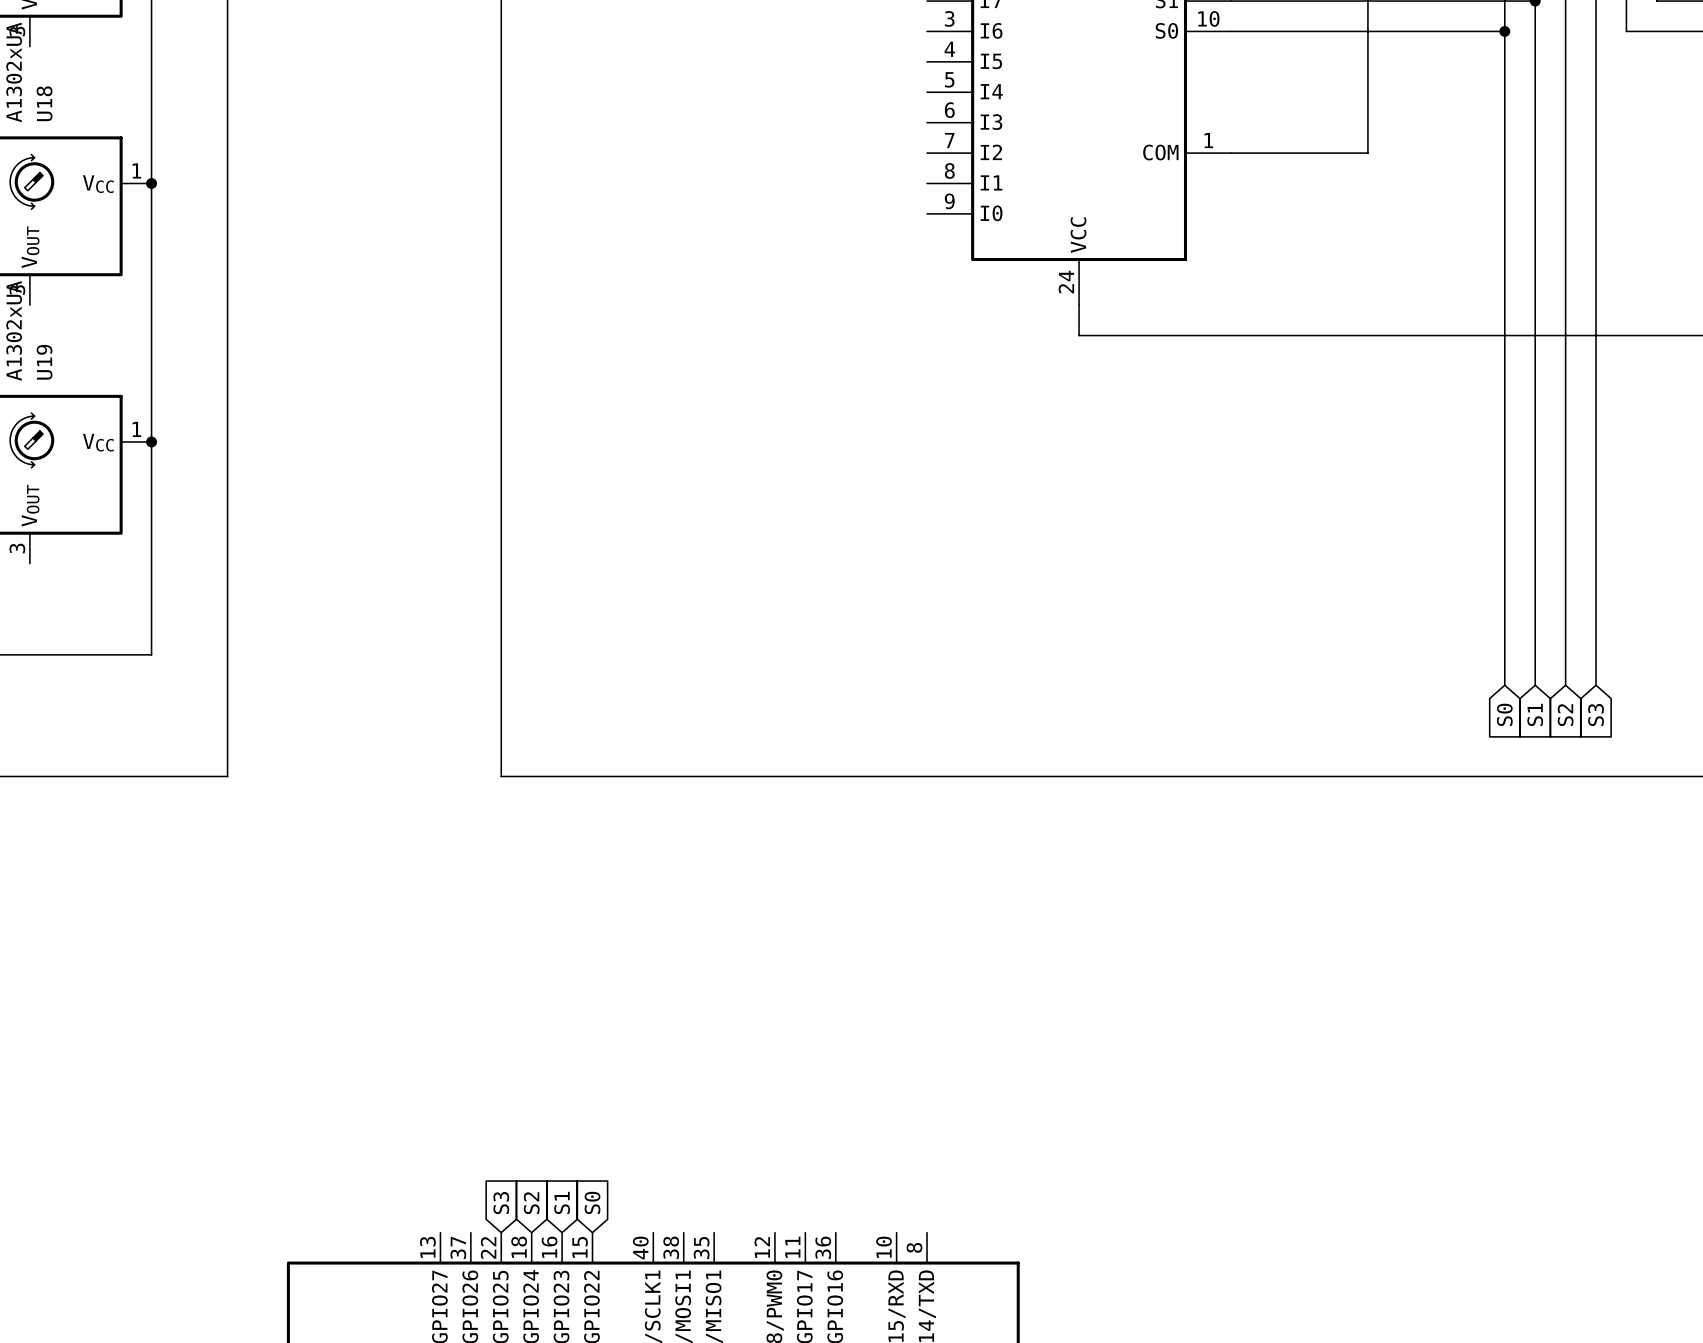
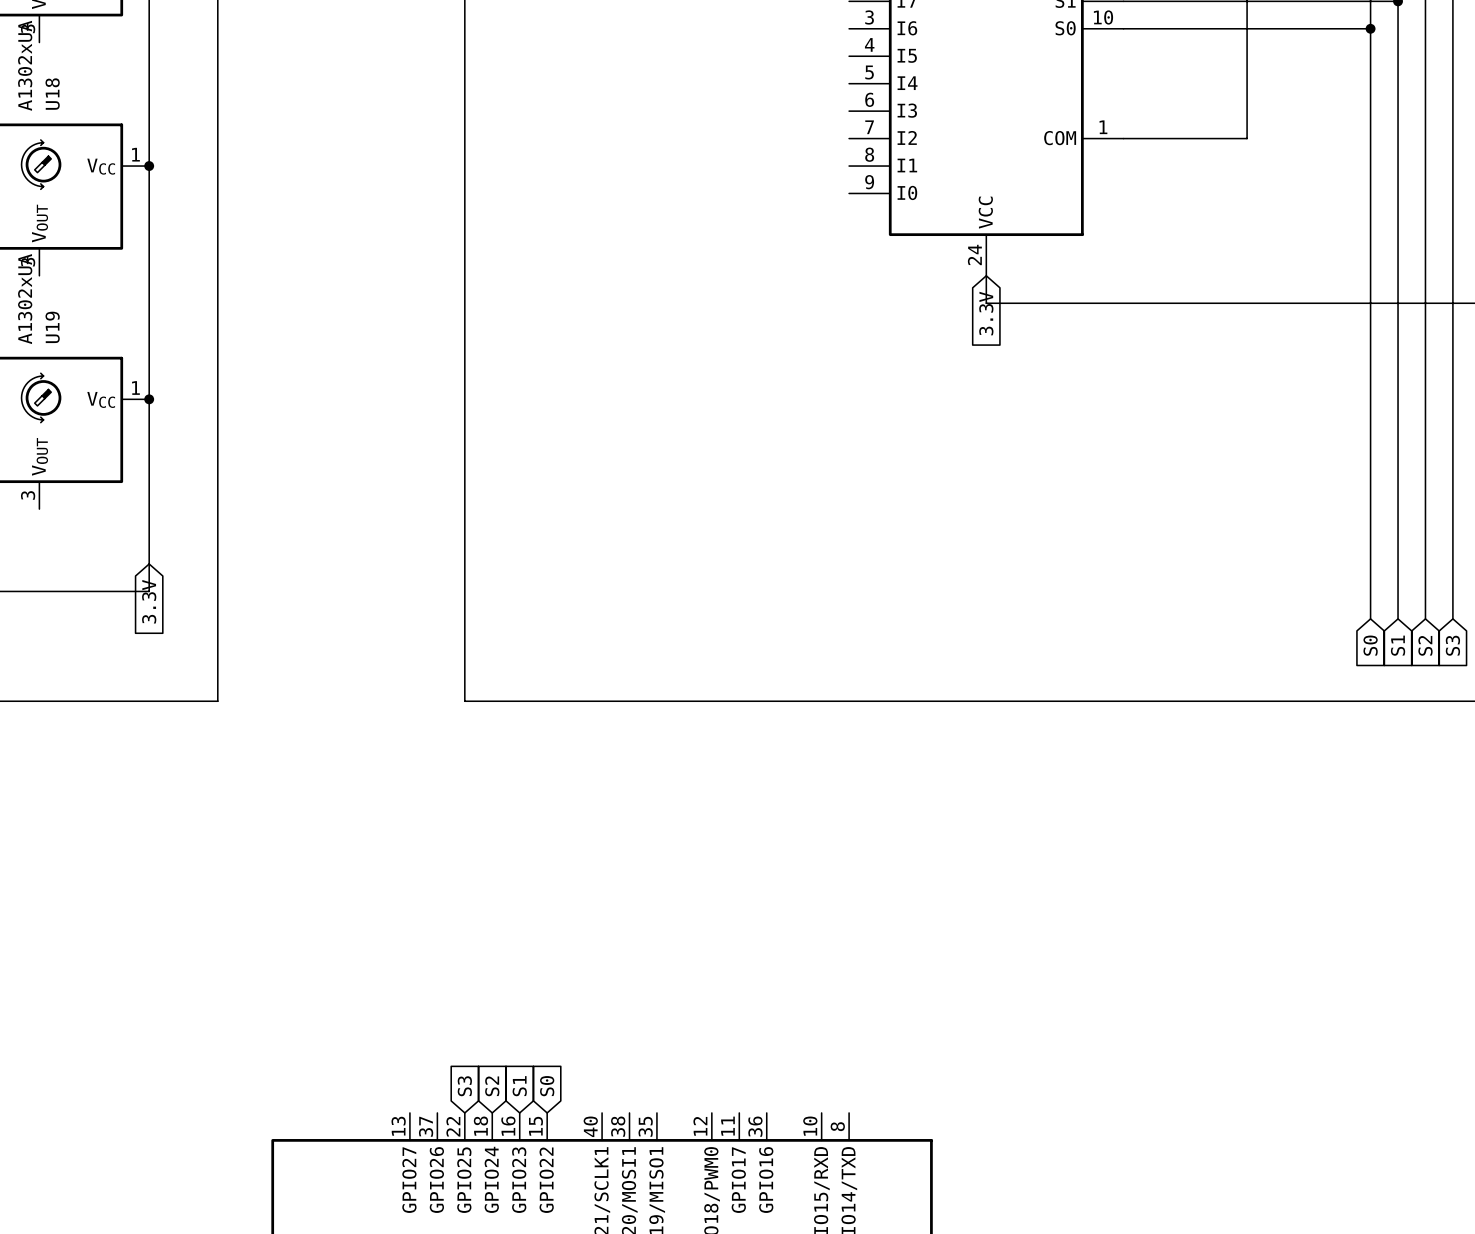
global label: none -> 3.3V (986, 313)
global label: none -> 3.3V (149, 601)

